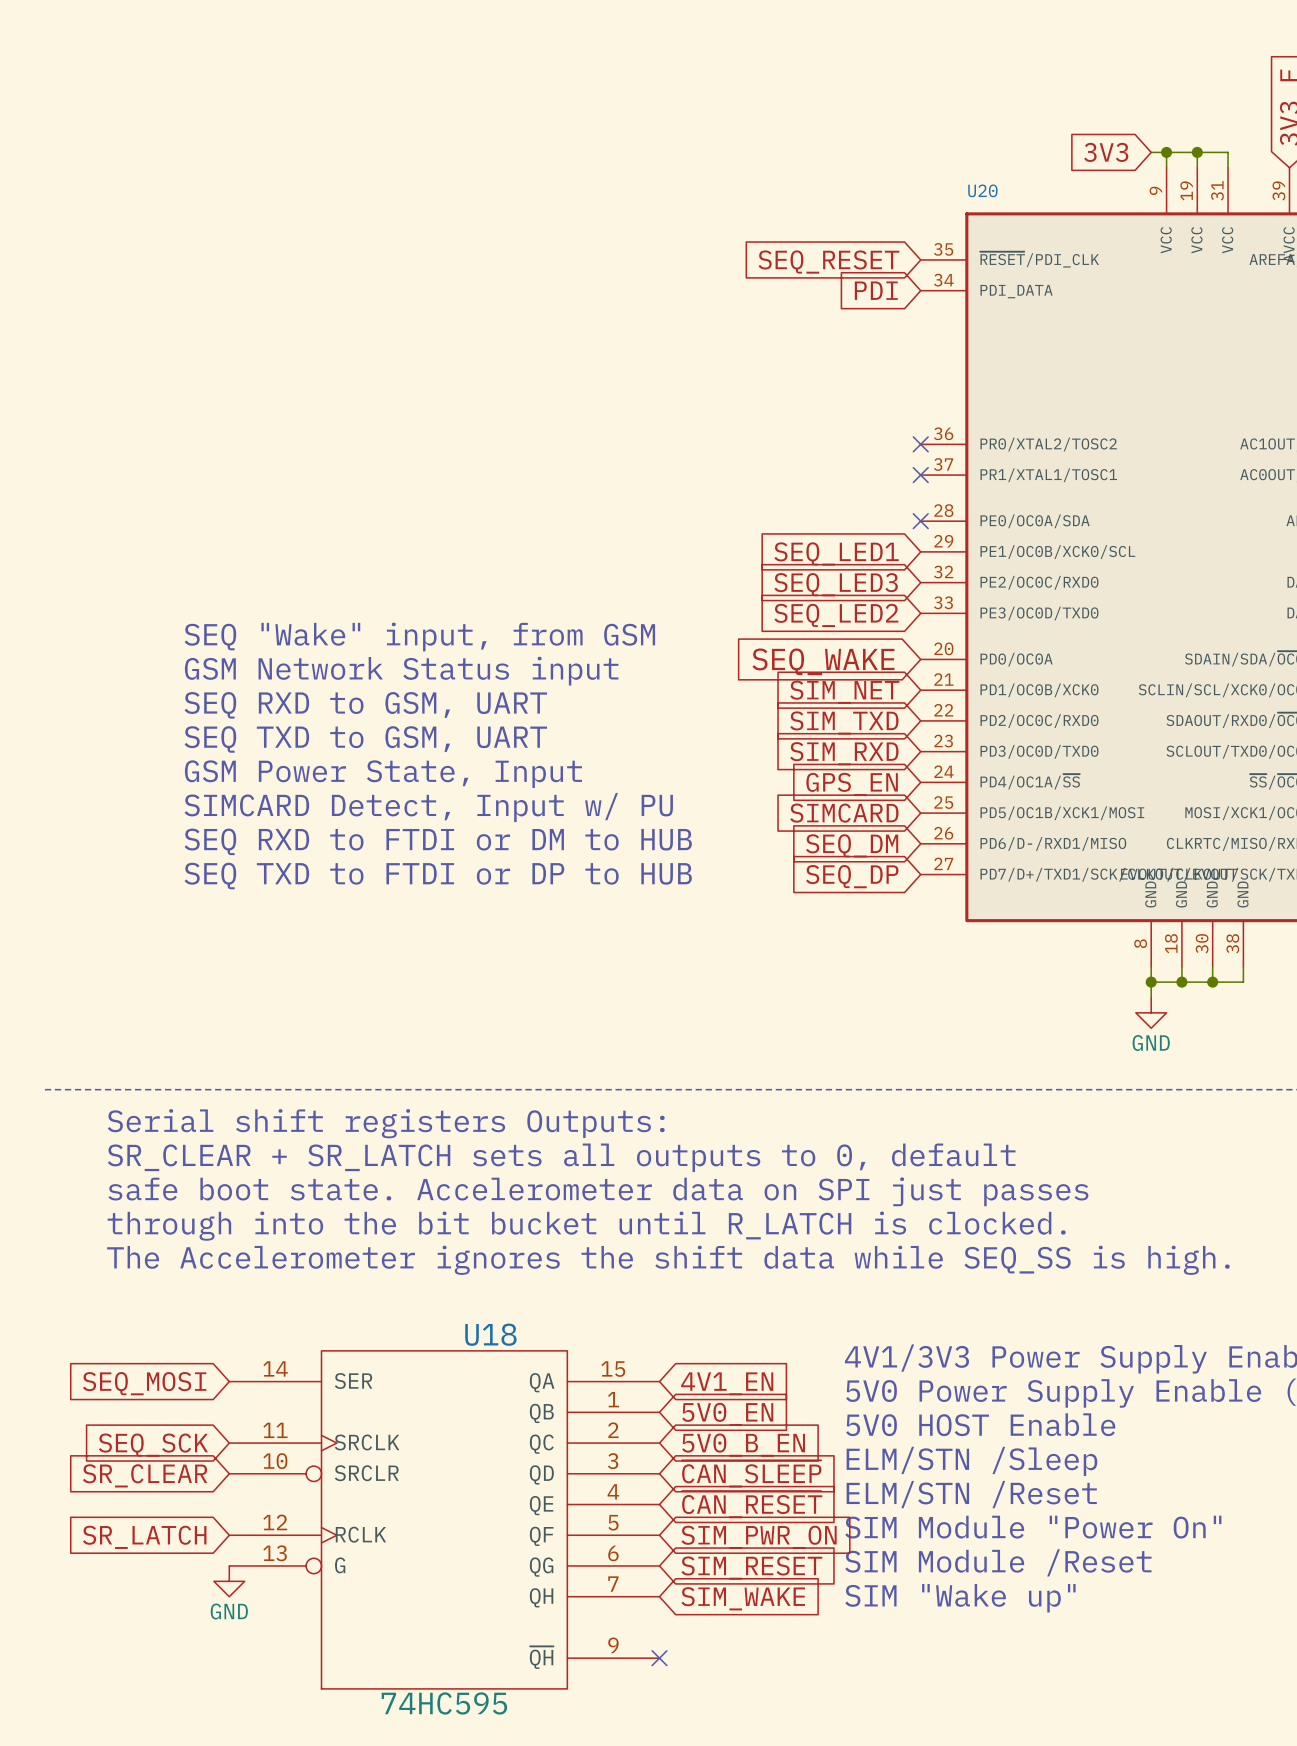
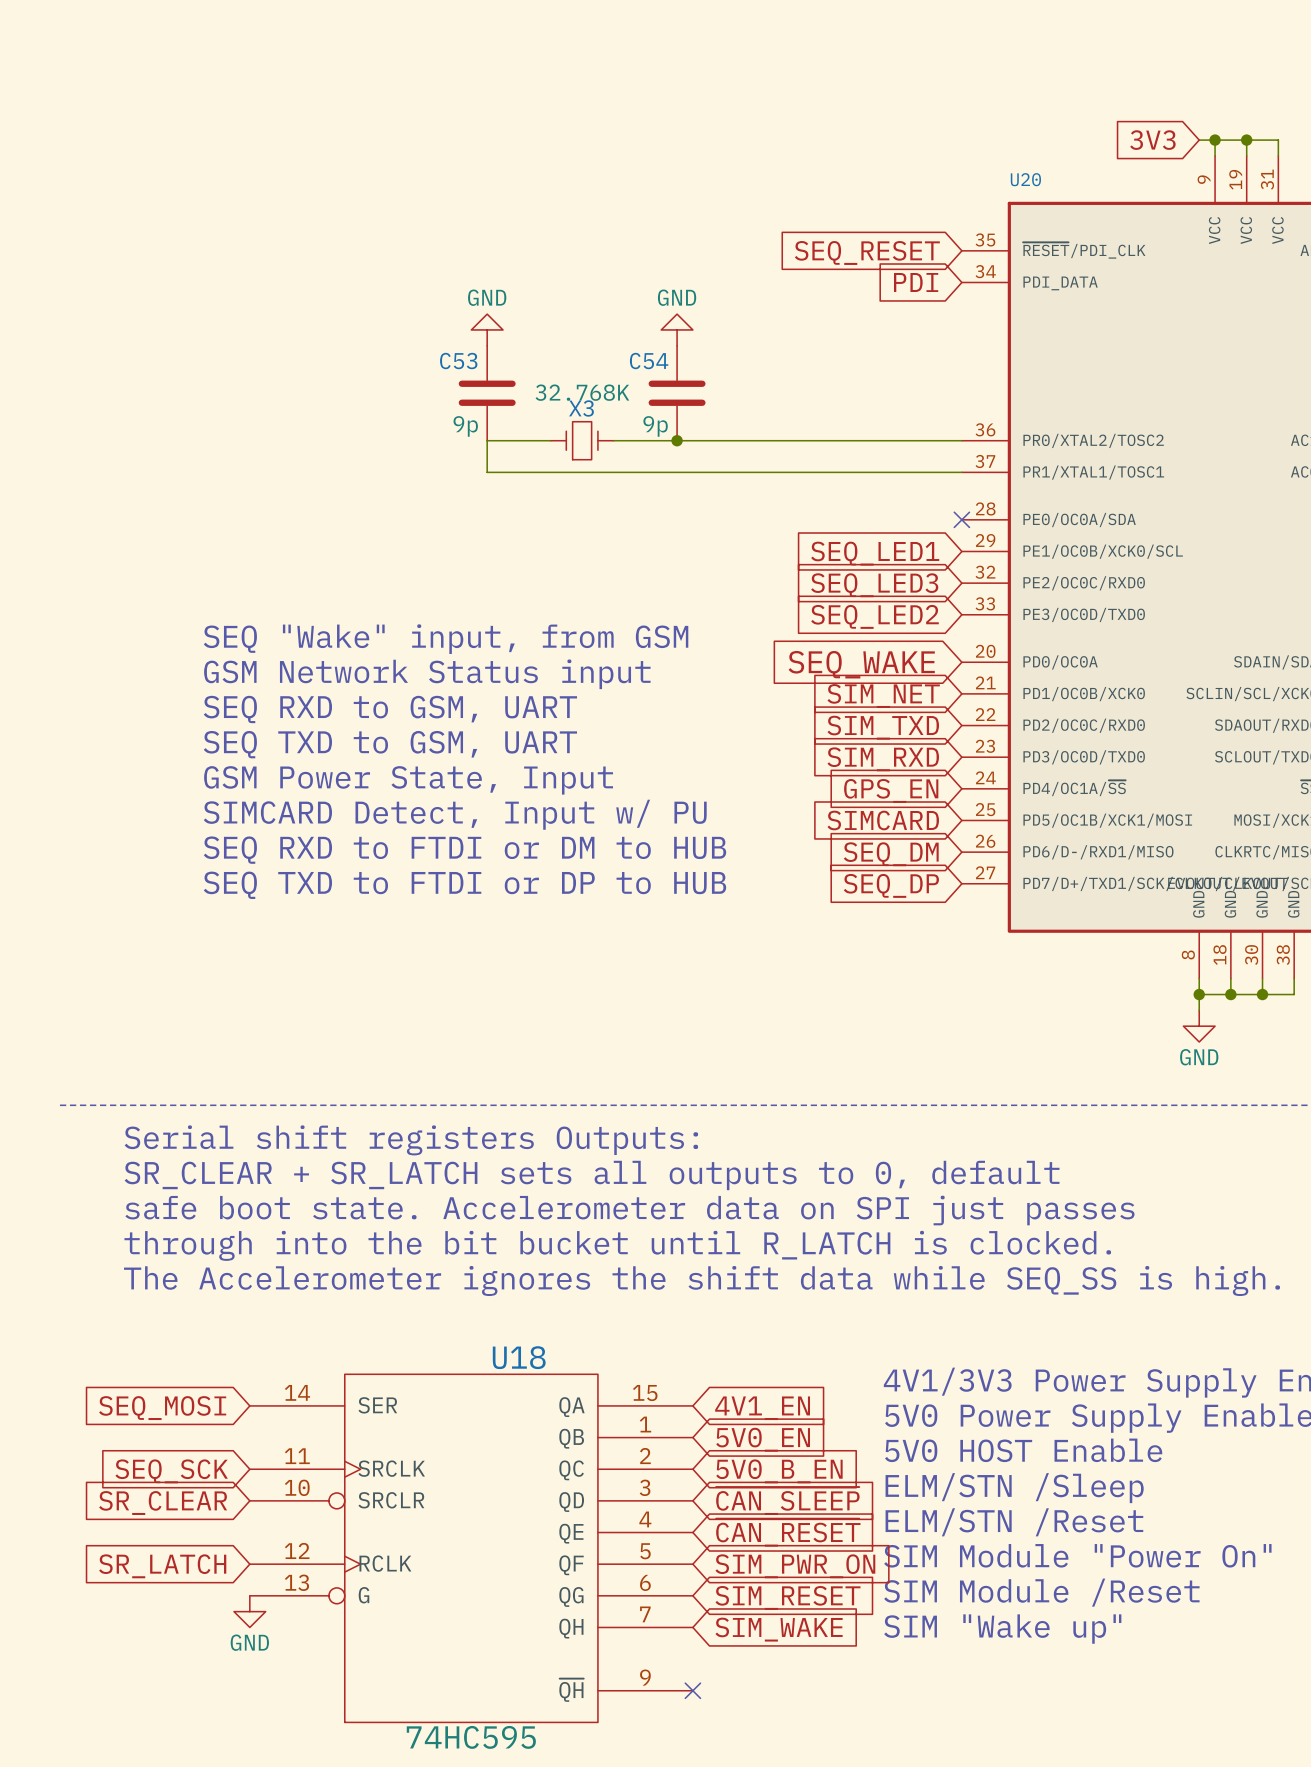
power symbol: none -> GND (487, 329)
power symbol: none -> GND (677, 329)
C53: none -> 9p (487, 393)
C54: none -> 9p (677, 393)
wire: none -> (550, 440) (487, 440) (487, 472) (961, 472)
X3: none -> 32.768K (582, 440)
wire: none -> (613, 440) (961, 440)
junction: none -> (677, 440)
no-connect mark: (920, 444) -> none
no-connect mark: (920, 475) -> none

